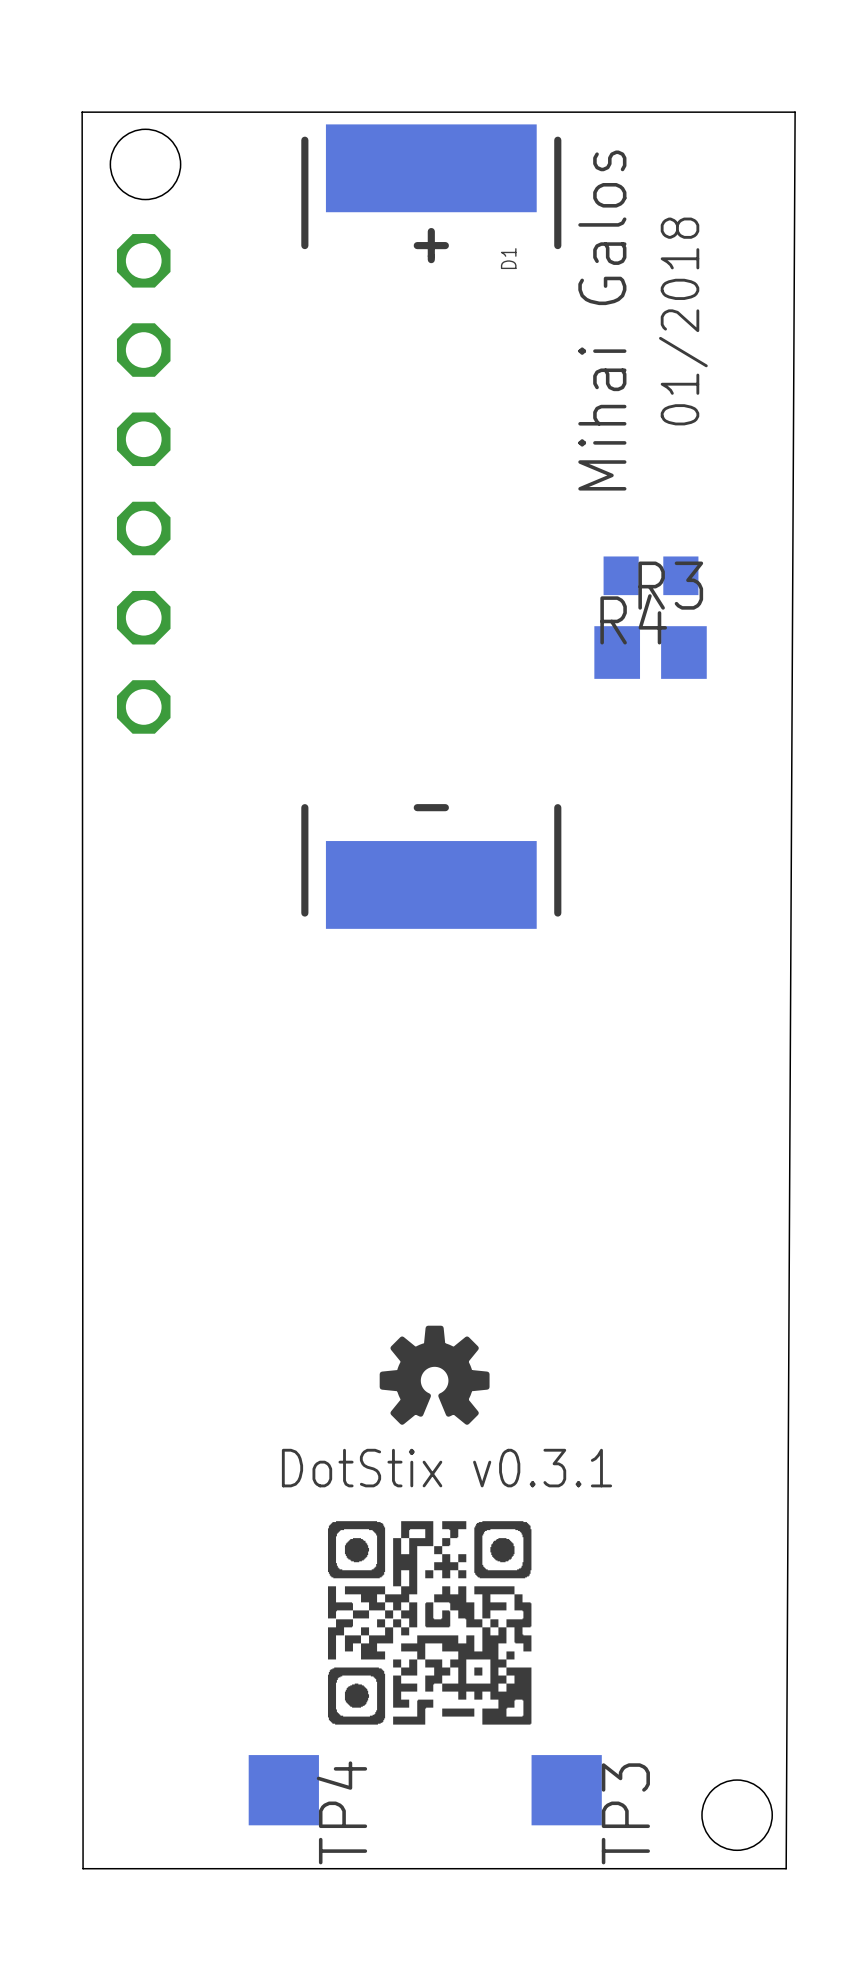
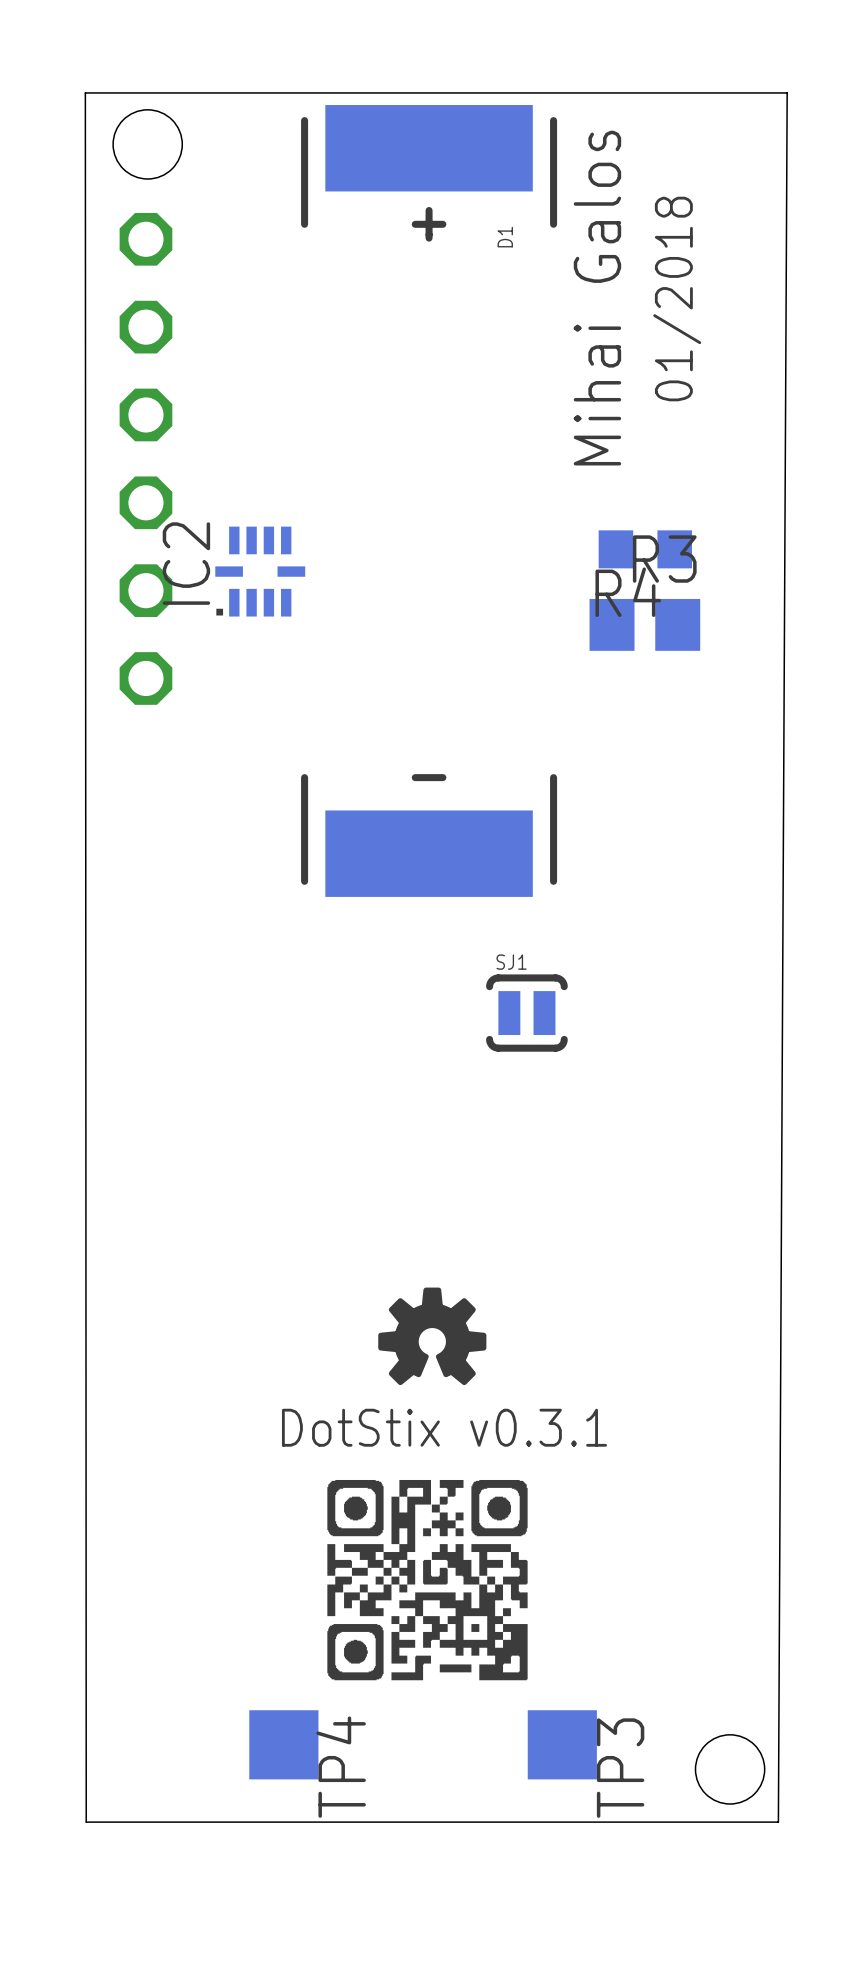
IC2: none -> (260, 571)
SJ1: none -> (526, 1013)

